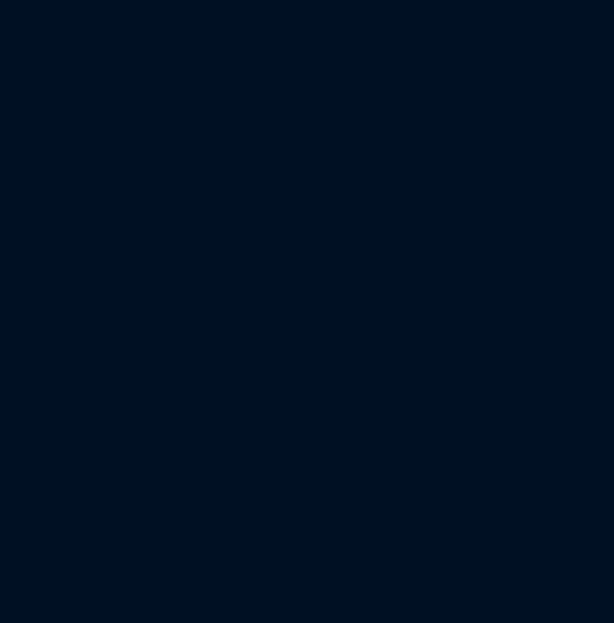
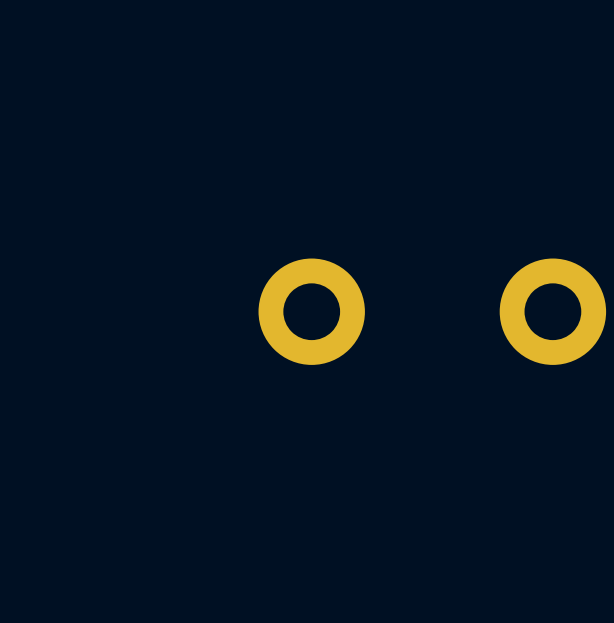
part: none -> (432, 311)

